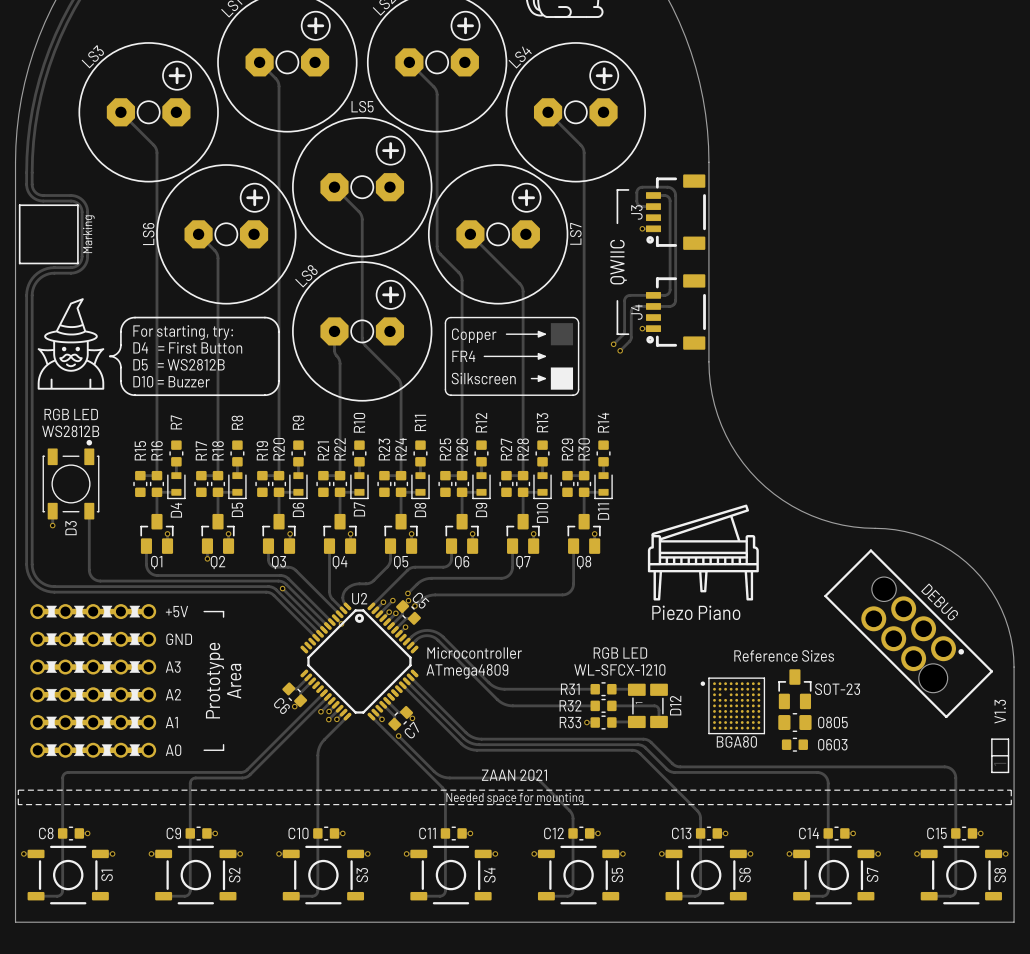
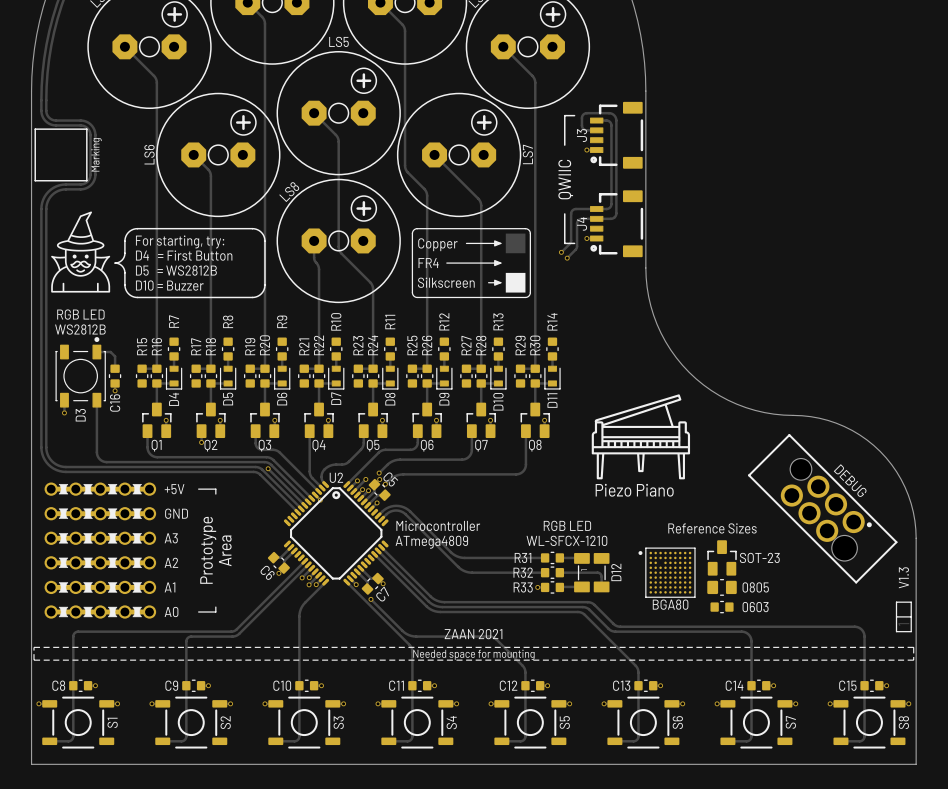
track: none -> (96, 352) (110, 352) (115, 356) (115, 368)
C16: none -> (115, 376)
via: none -> (115, 390)

